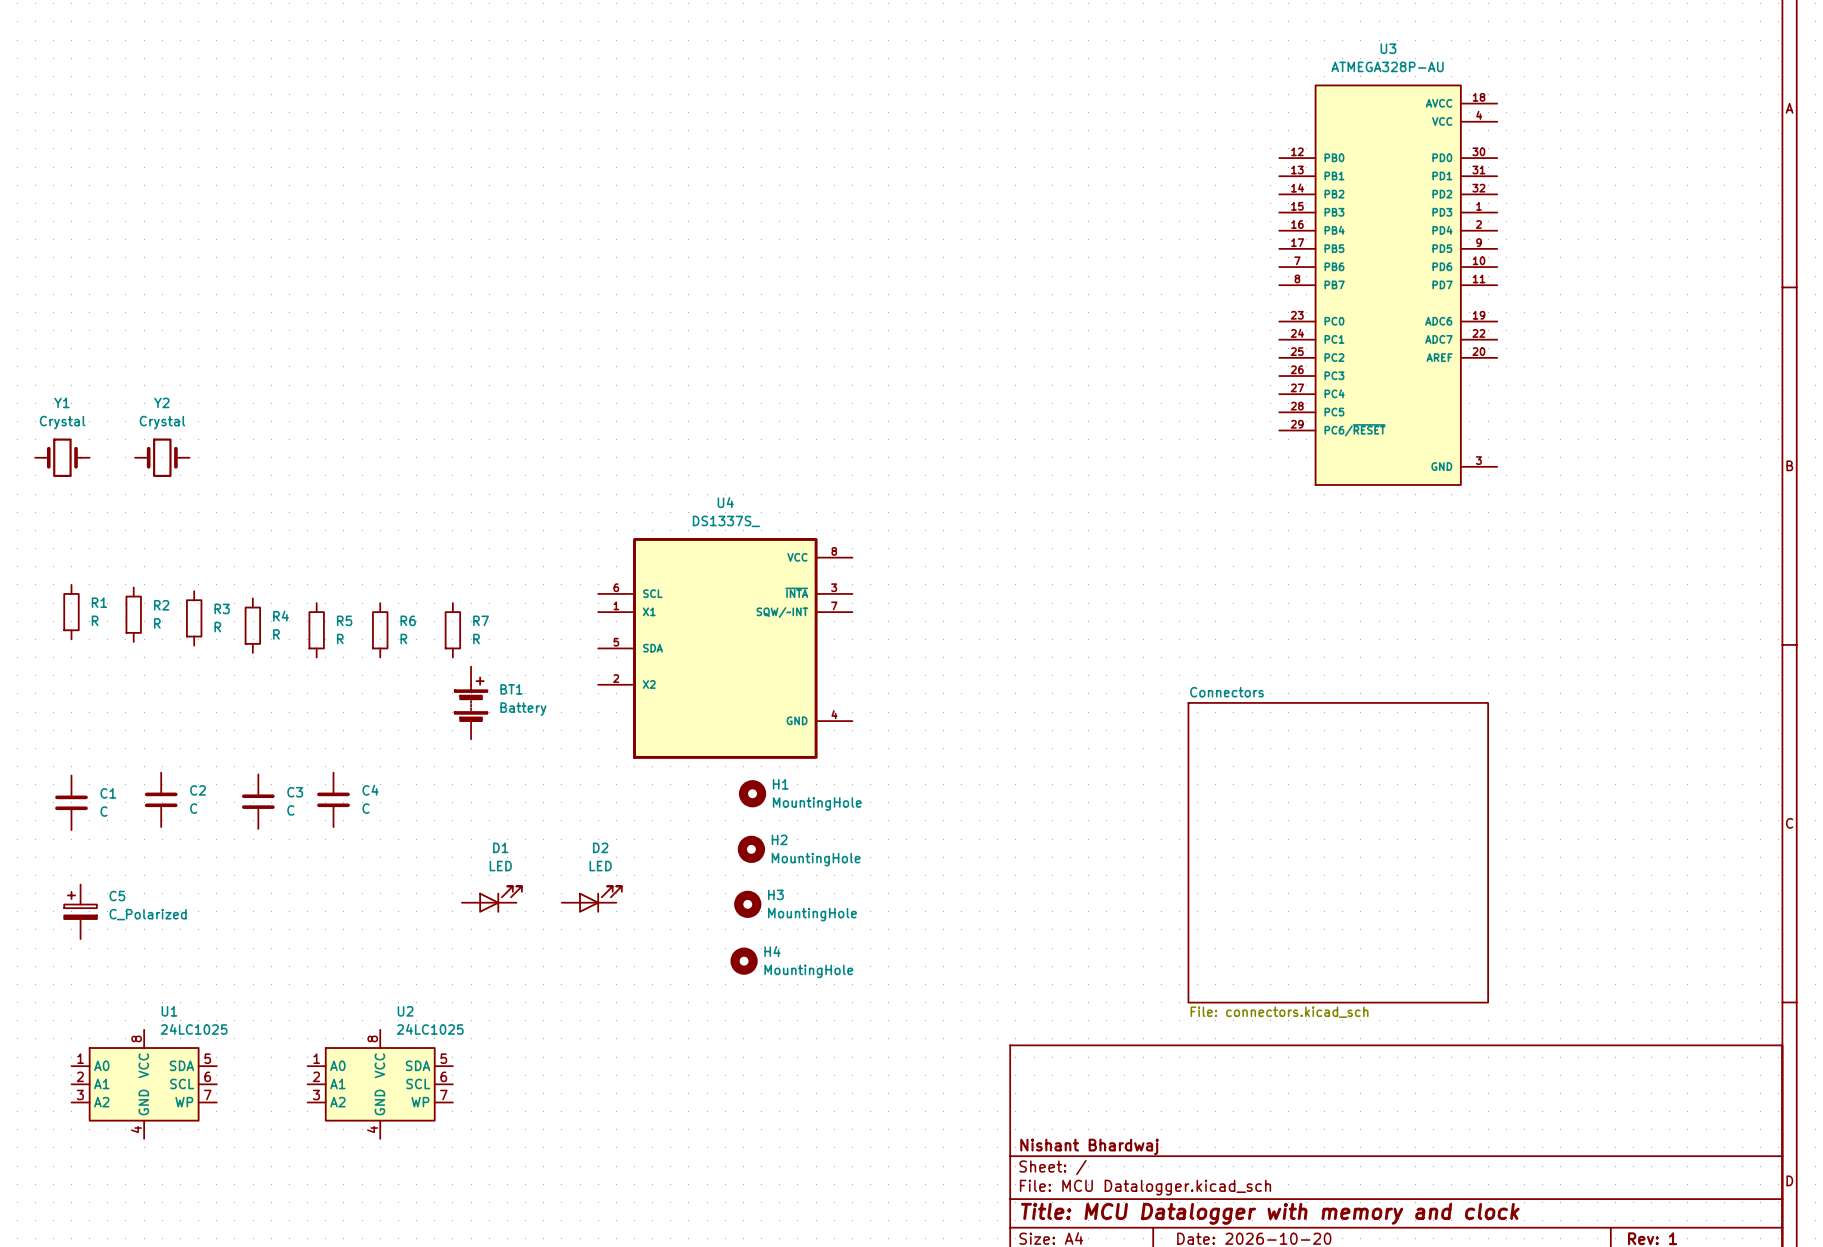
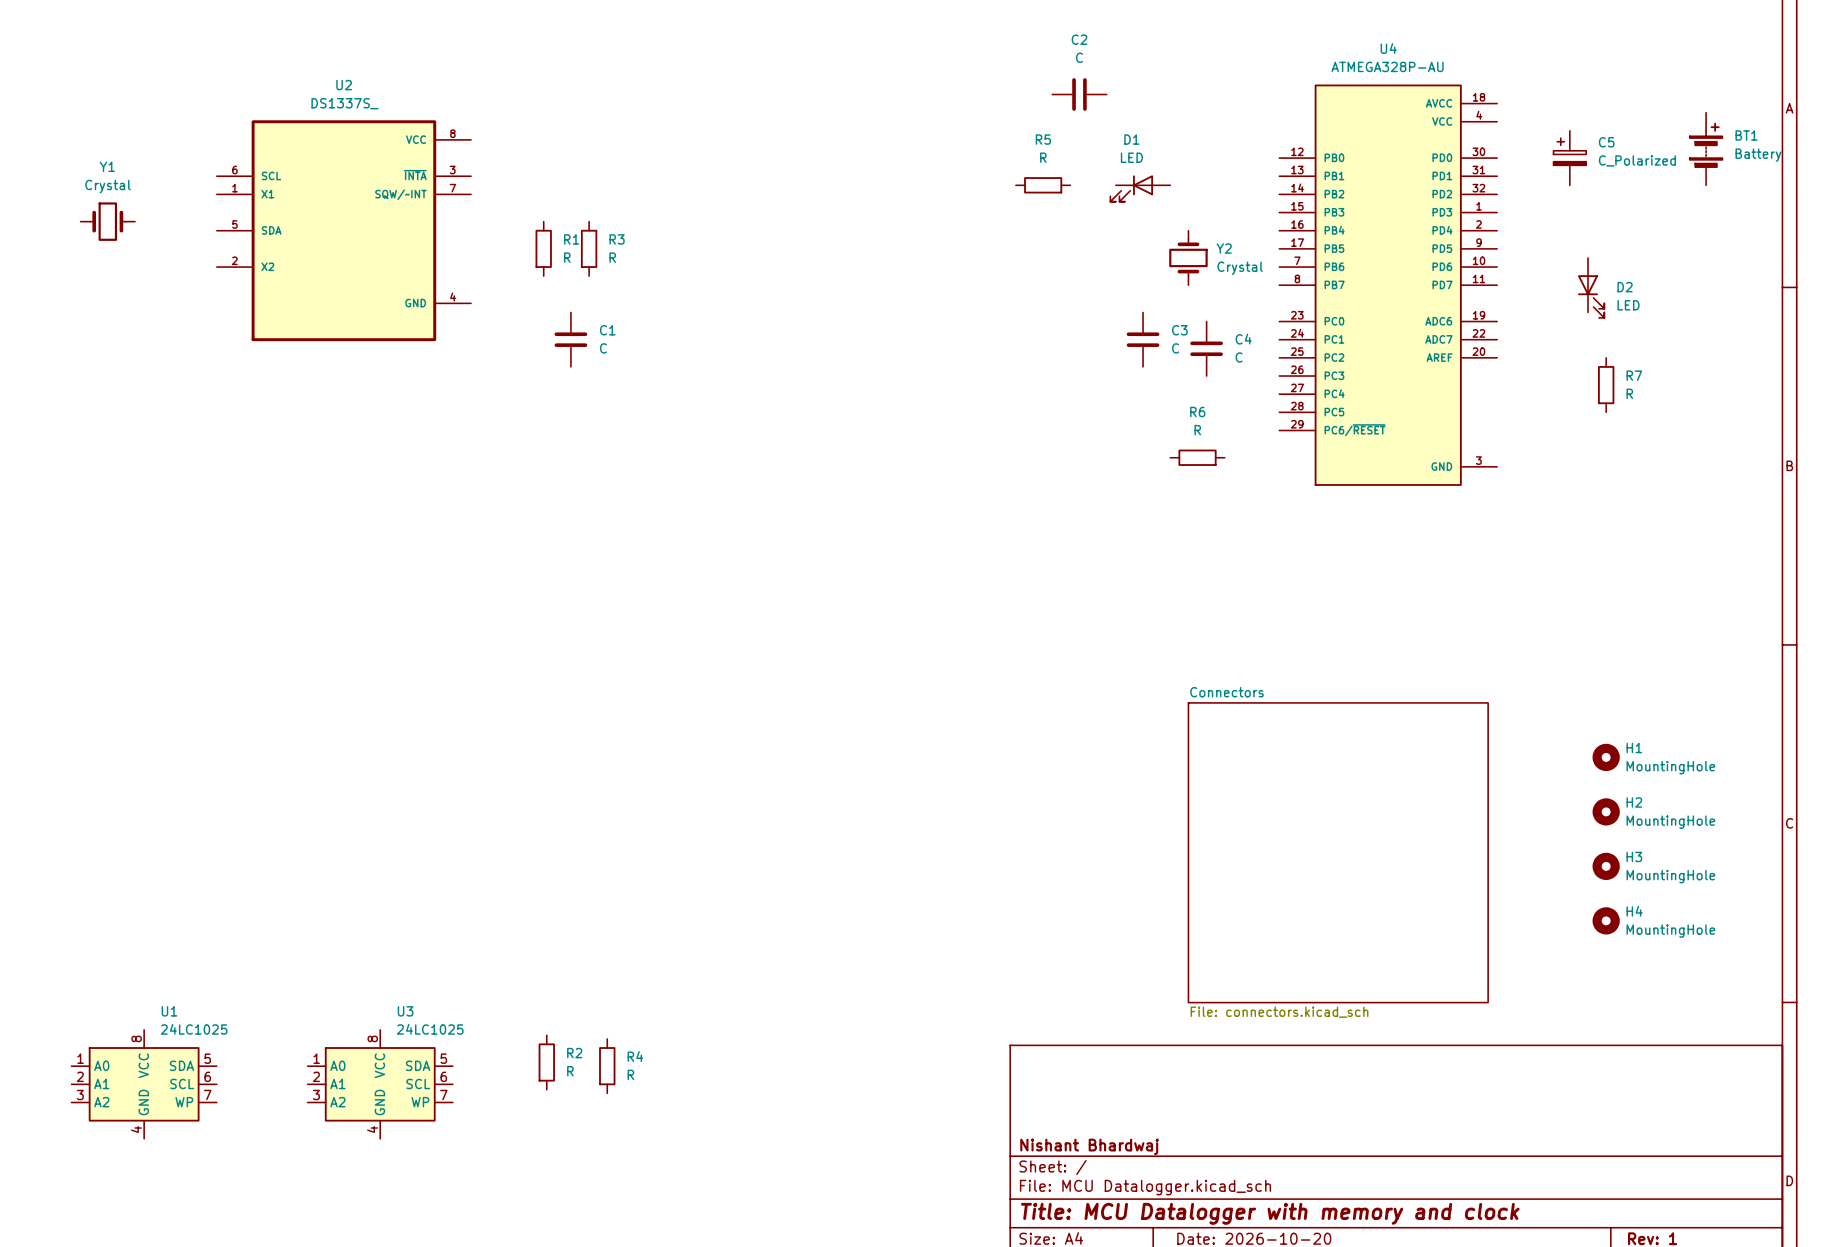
U3 name: U3 (1388, 48) -> U4 (1388, 48)
U2: none -> DS1337S_ (343, 230)
Y2 name position: Y2 (161, 402) -> Y2 (1224, 248)
Y2 value position: Crystal (162, 422) -> Crystal (1240, 268)
Y1 position: (62, 457) -> (107, 221)
Y2 rotation: 0° (162, 457) -> 90° clockwise (1188, 257)
Y2 position: (162, 457) -> (1188, 257)
R1 position: (71, 612) -> (543, 248)
R2 position: (133, 614) -> (546, 1062)
R3 position: (194, 618) -> (589, 248)
R5 name position: R5 (344, 620) -> R5 (1043, 139)
R6 name position: R6 (408, 620) -> R6 (1197, 412)
R4 position: (252, 625) -> (607, 1066)
R5 rotation: 0° (316, 630) -> 90° clockwise (1043, 185)
R5 position: (316, 630) -> (1043, 185)
R6 rotation: 0° (380, 630) -> 90° clockwise (1197, 457)
R6 position: (380, 630) -> (1197, 457)
R7 position: (452, 630) -> (1606, 385)
R5 value position: R (340, 639) -> R (1043, 157)
R6 value position: R (403, 639) -> R (1197, 430)
U4: DS1337S_ (725, 648) -> none
BT1 position: (471, 702) -> (1706, 148)
C2 name position: C2 (198, 790) -> C2 (1079, 39)
H1 position: (752, 793) -> (1606, 757)
C2 rotation: 0° (161, 799) -> 90° clockwise (1079, 94)
C2 position: (161, 799) -> (1079, 94)
C4 position: (333, 799) -> (1206, 348)
C3 position: (258, 801) -> (1143, 339)
C1 position: (71, 802) -> (570, 339)
C2 value position: C (193, 808) -> C (1079, 57)
D1 name position: D1 (500, 847) -> D1 (1131, 139)
D2 name position: D2 (600, 847) -> D2 (1625, 287)
H2 position: (751, 849) -> (1606, 811)
D1 value position: LED (500, 866) -> LED (1131, 157)
D1 position: (491, 899) -> (1140, 188)
D1 rotation: 0° (500, 899) -> 180° (1131, 188)
D2 position: (591, 899) -> (1591, 287)
D2 rotation: 0° (600, 899) -> 90° clockwise (1591, 296)
H3 position: (747, 904) -> (1606, 866)
C5 position: (80, 911) -> (1569, 158)
H4 position: (744, 961) -> (1606, 920)
U2 name: U2 (405, 1011) -> U3 (405, 1011)

